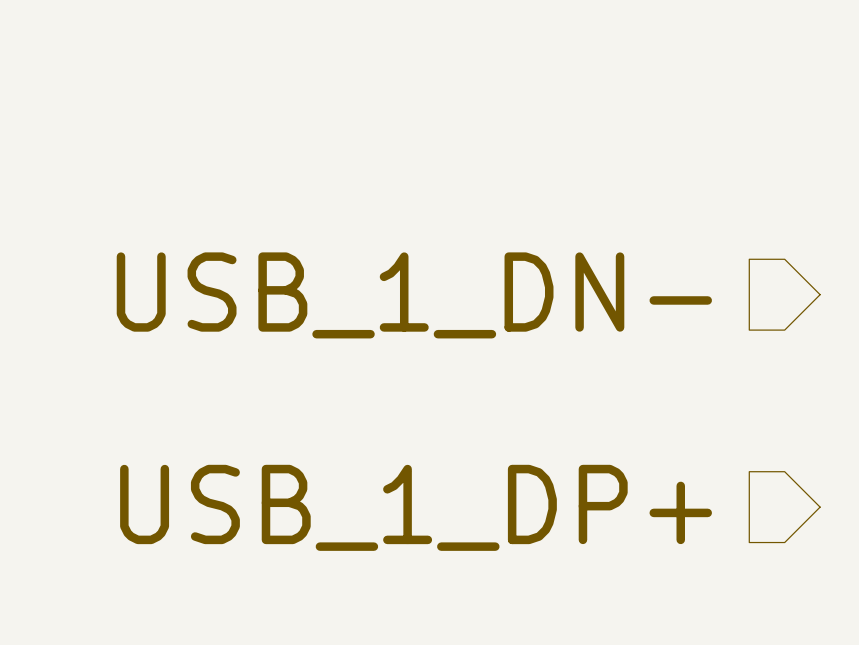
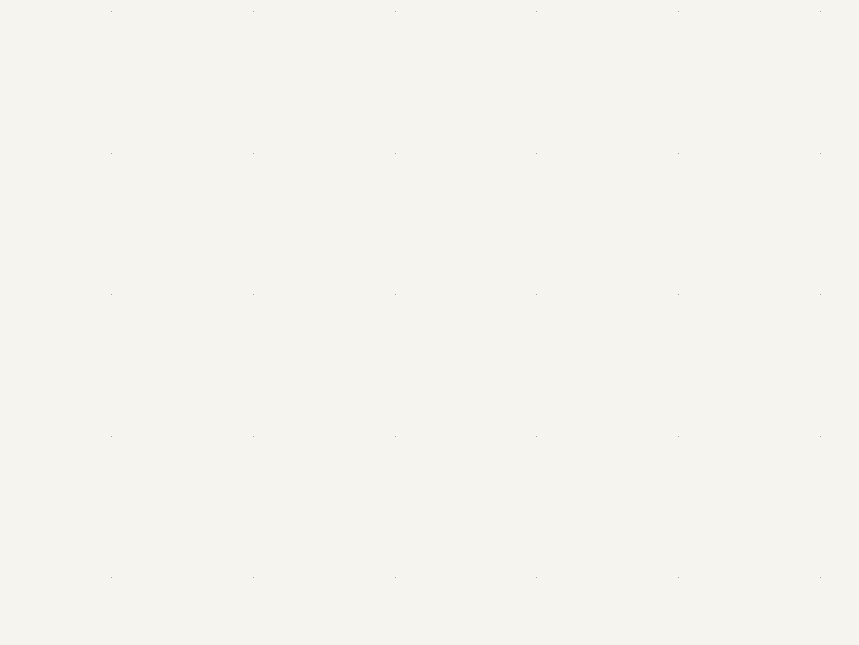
hierarchical label: USB_1_DN- (414, 295) -> none
hierarchical label: USB_1_DP+ (416, 507) -> none

